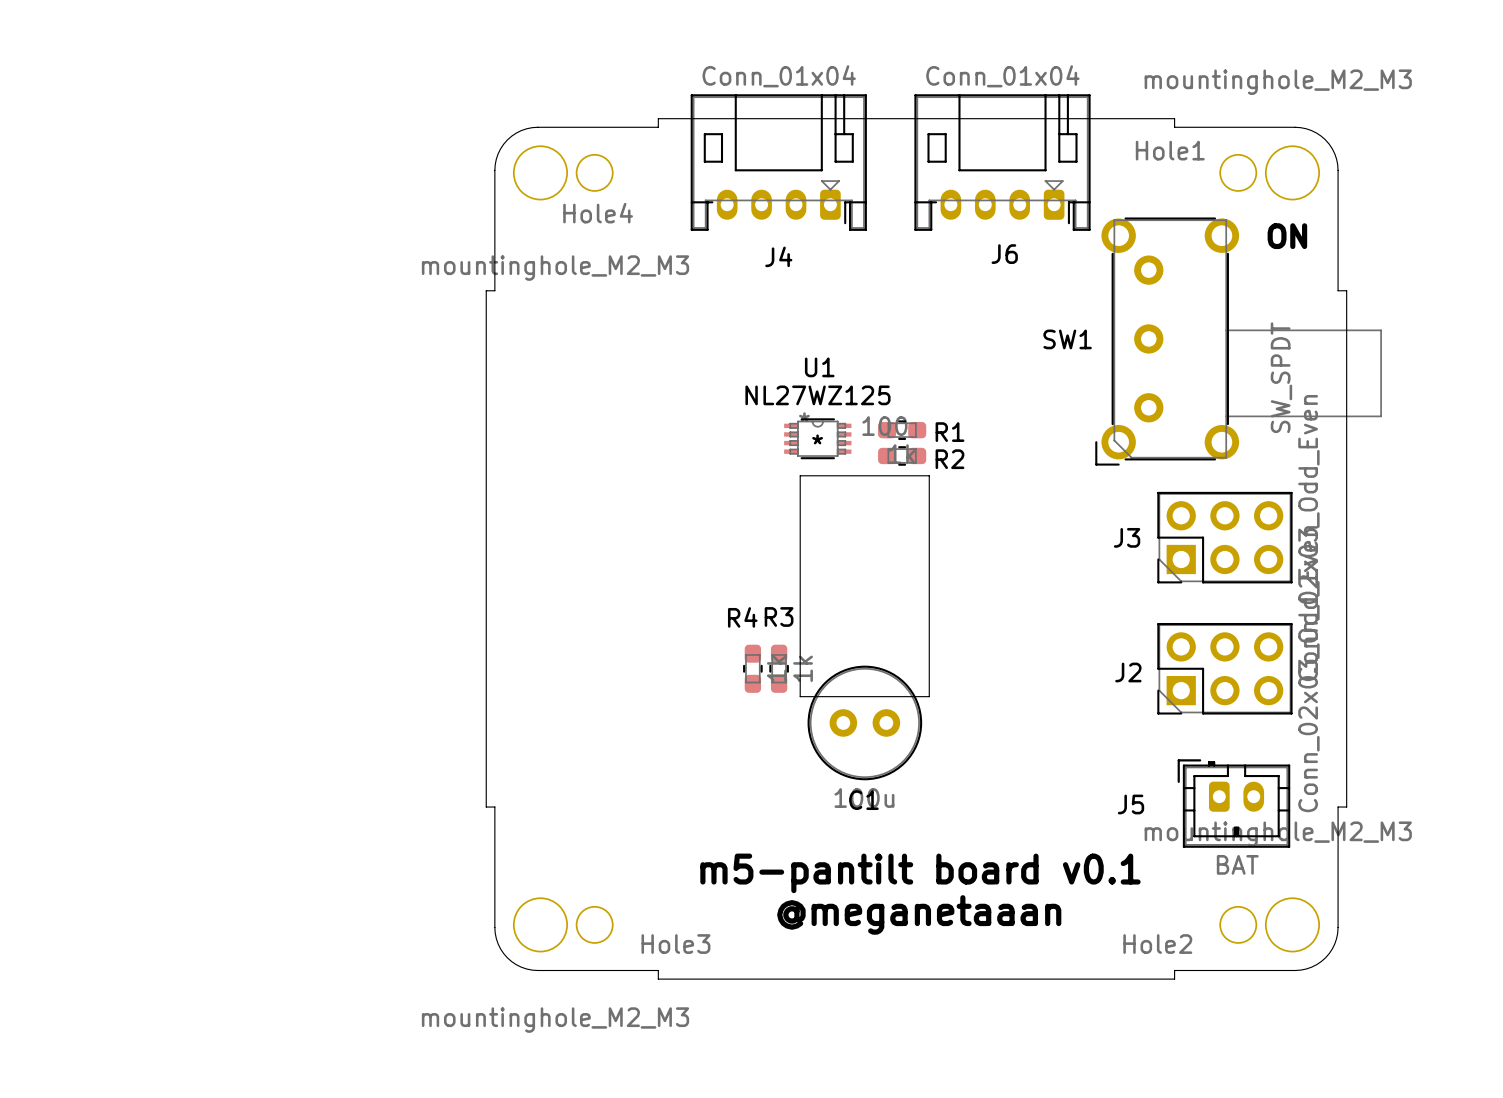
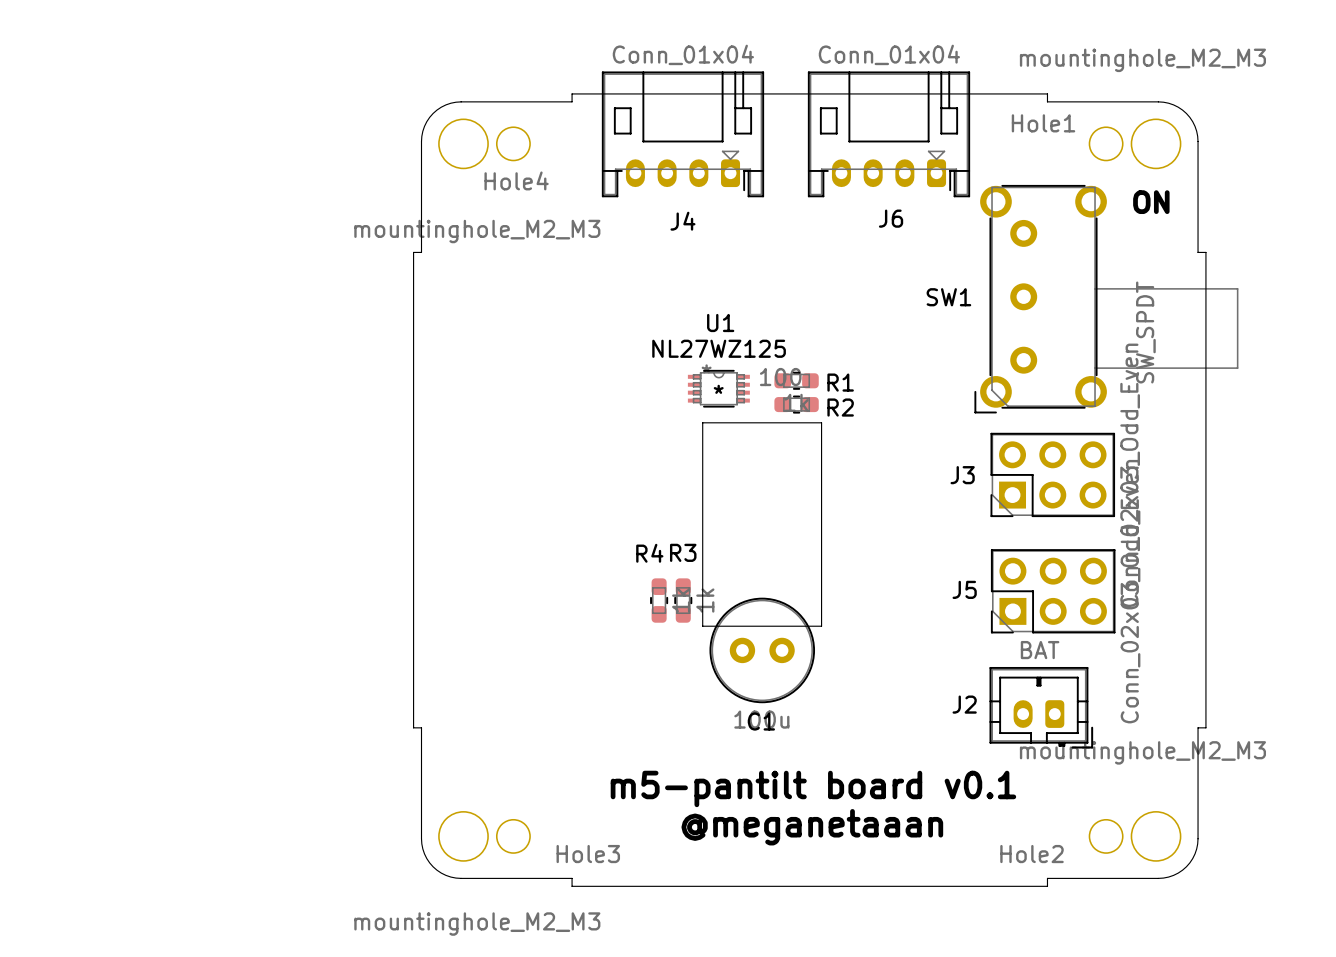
J3 position: (1224, 537) -> (1052, 474)
J2 position: (1224, 668) -> (1053, 591)
J2 name position: J2 (1128, 672) -> J2 (964, 704)
J5 rotation: 0° (1233, 803) -> 180° (1041, 707)
J5 position: (1233, 803) -> (1041, 707)
J5 name position: J5 (1130, 804) -> J5 (964, 589)

